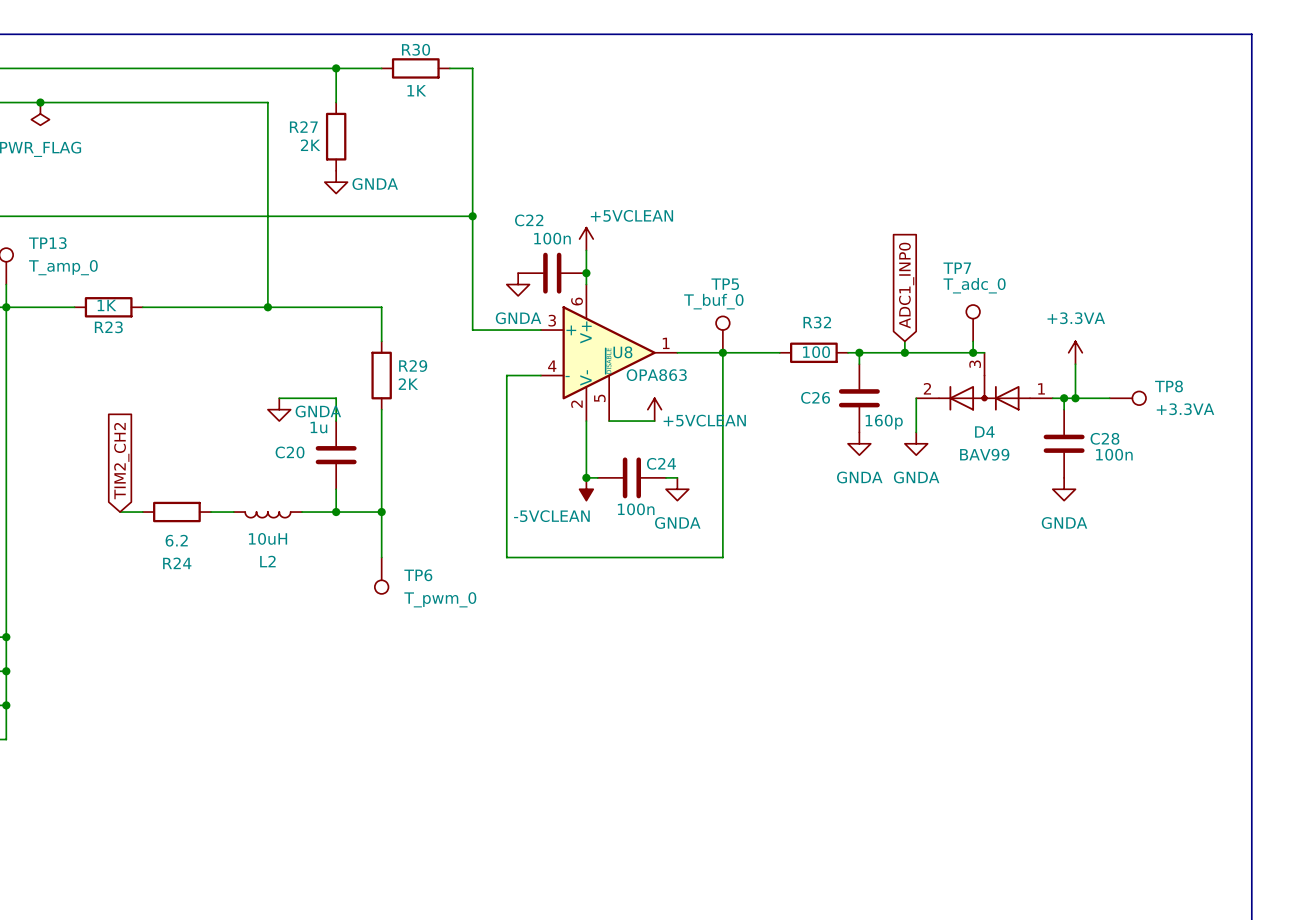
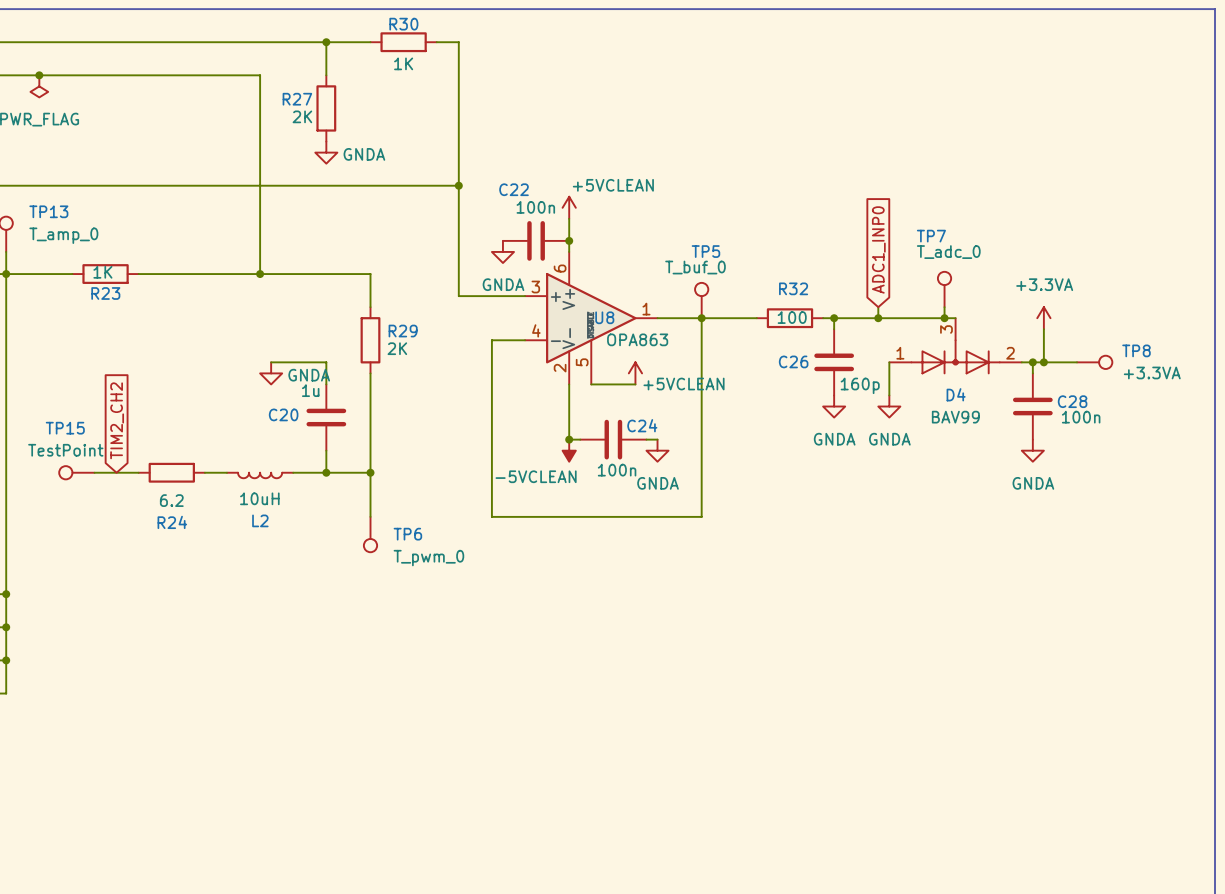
D4 flip: as is (984, 393) -> left-right (955, 357)
TP15: none -> TestPoint (76, 472)
wire: none -> (94, 472) (116, 472)

